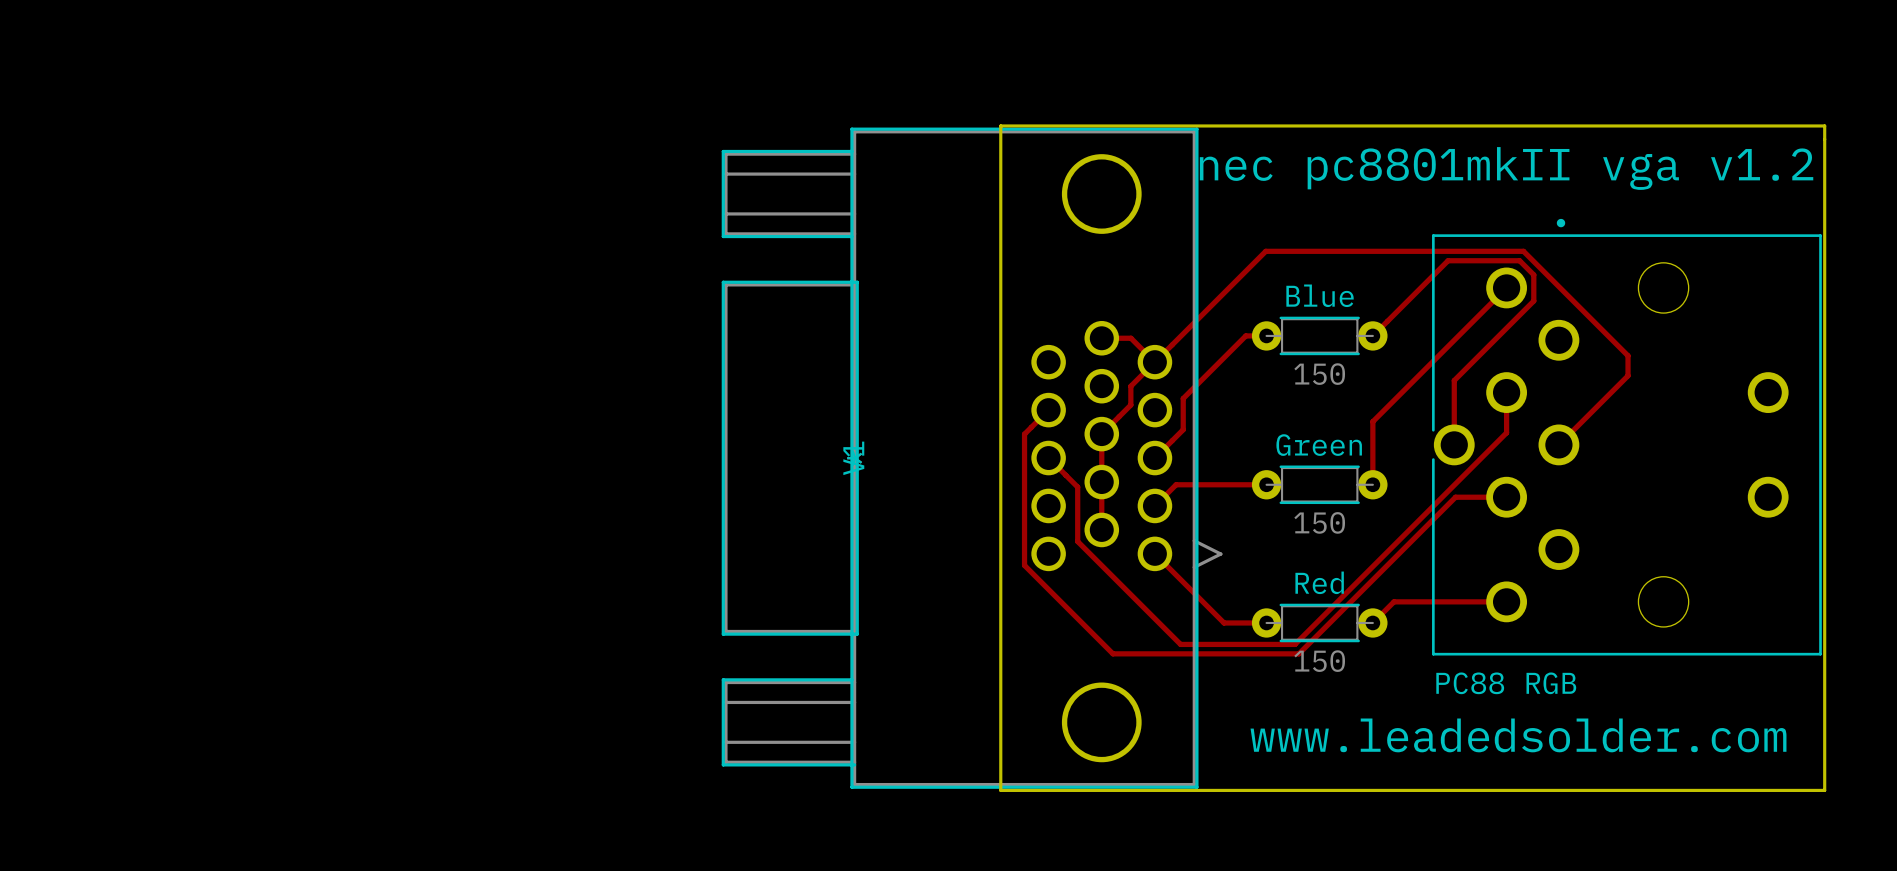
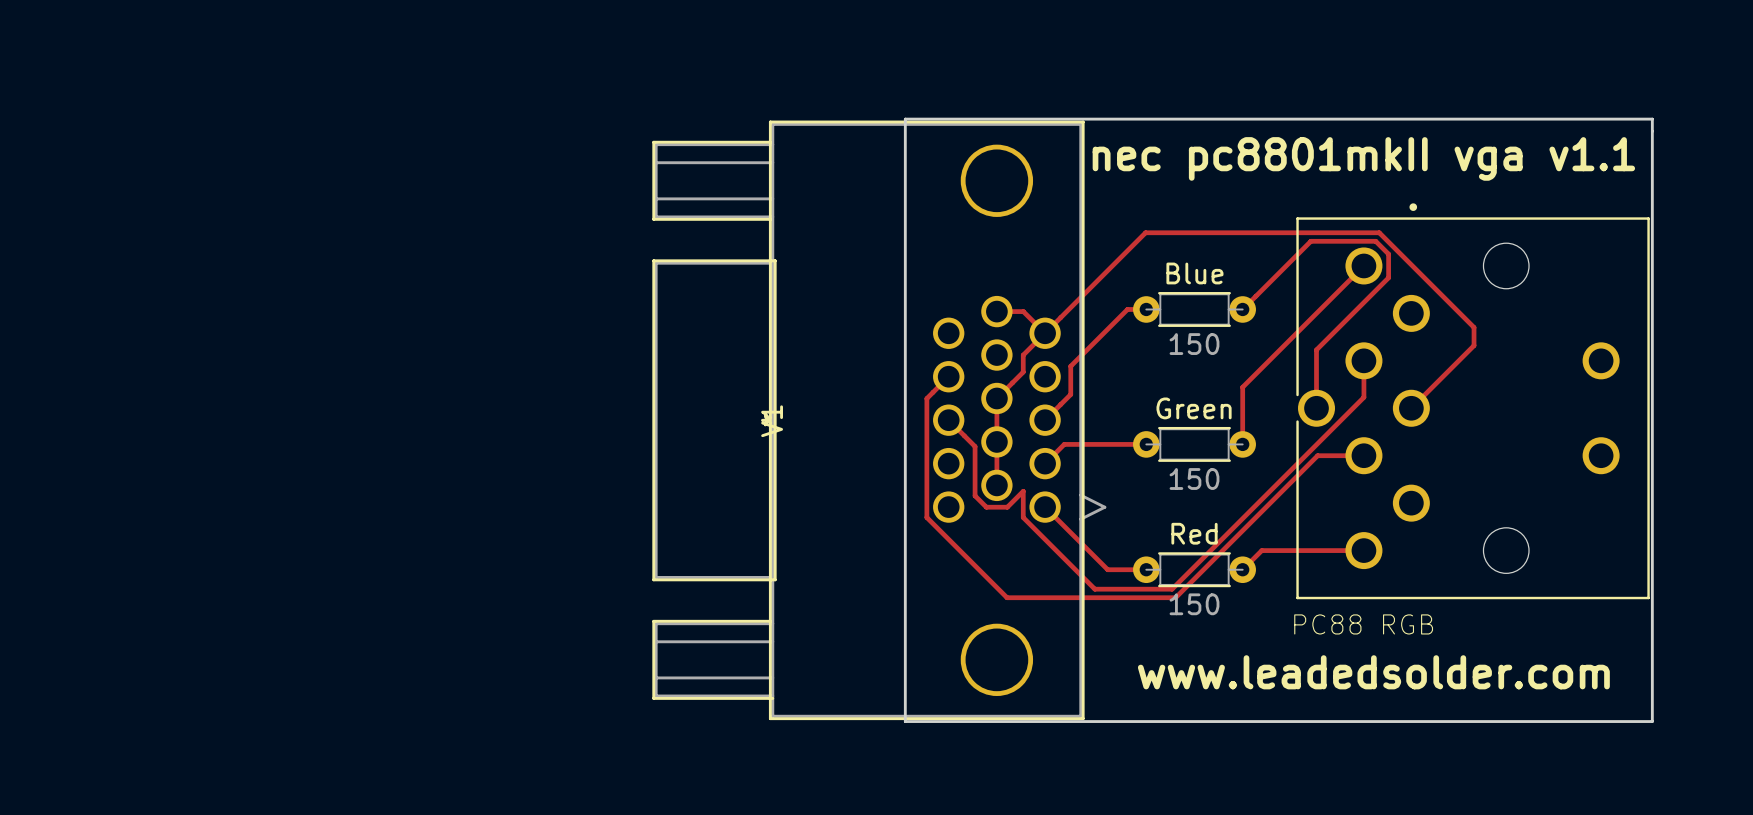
text: nec pc8801mkII vga v1.2 (1506, 168) -> nec pc8801mkII vga v1.1 (1363, 158)
top track: (1090, 554) (1180, 644) (1209, 644) -> (986, 507) (1007, 507) (1023, 491) (1023, 517) (1094, 589)

